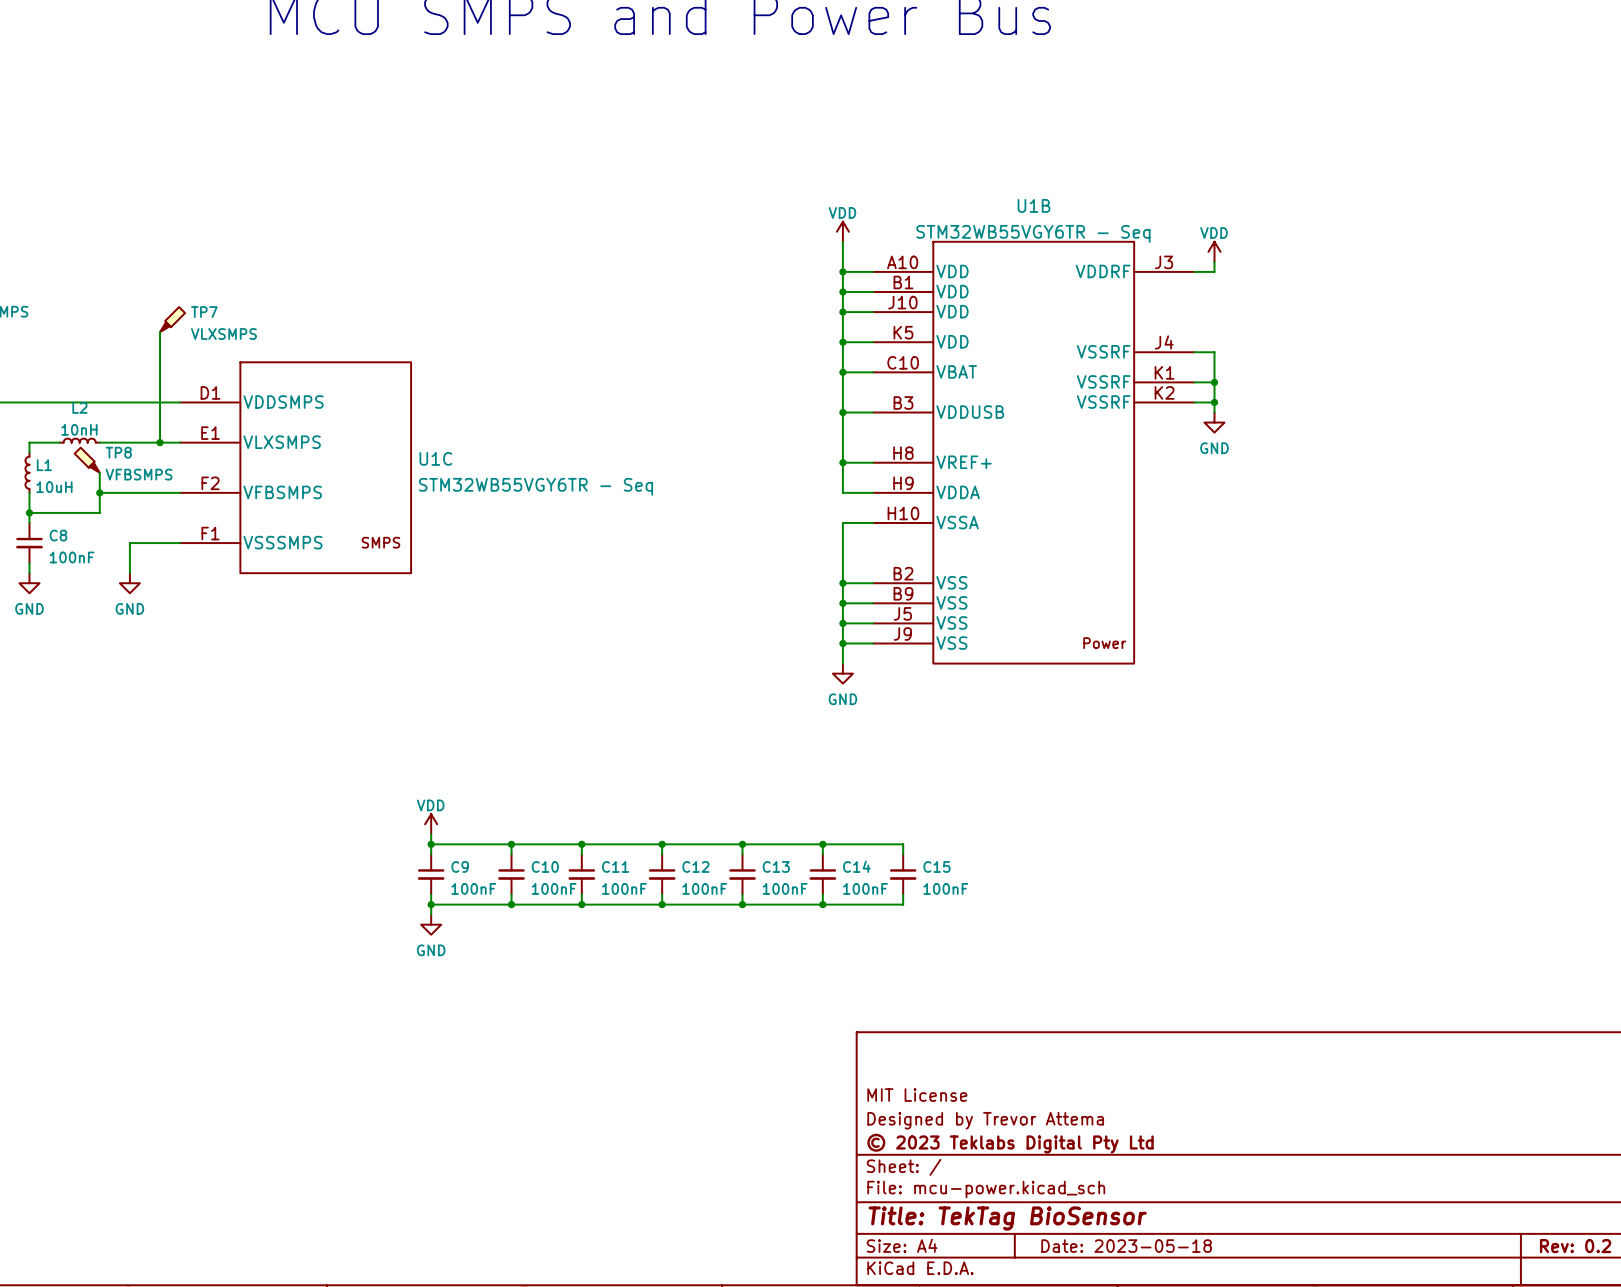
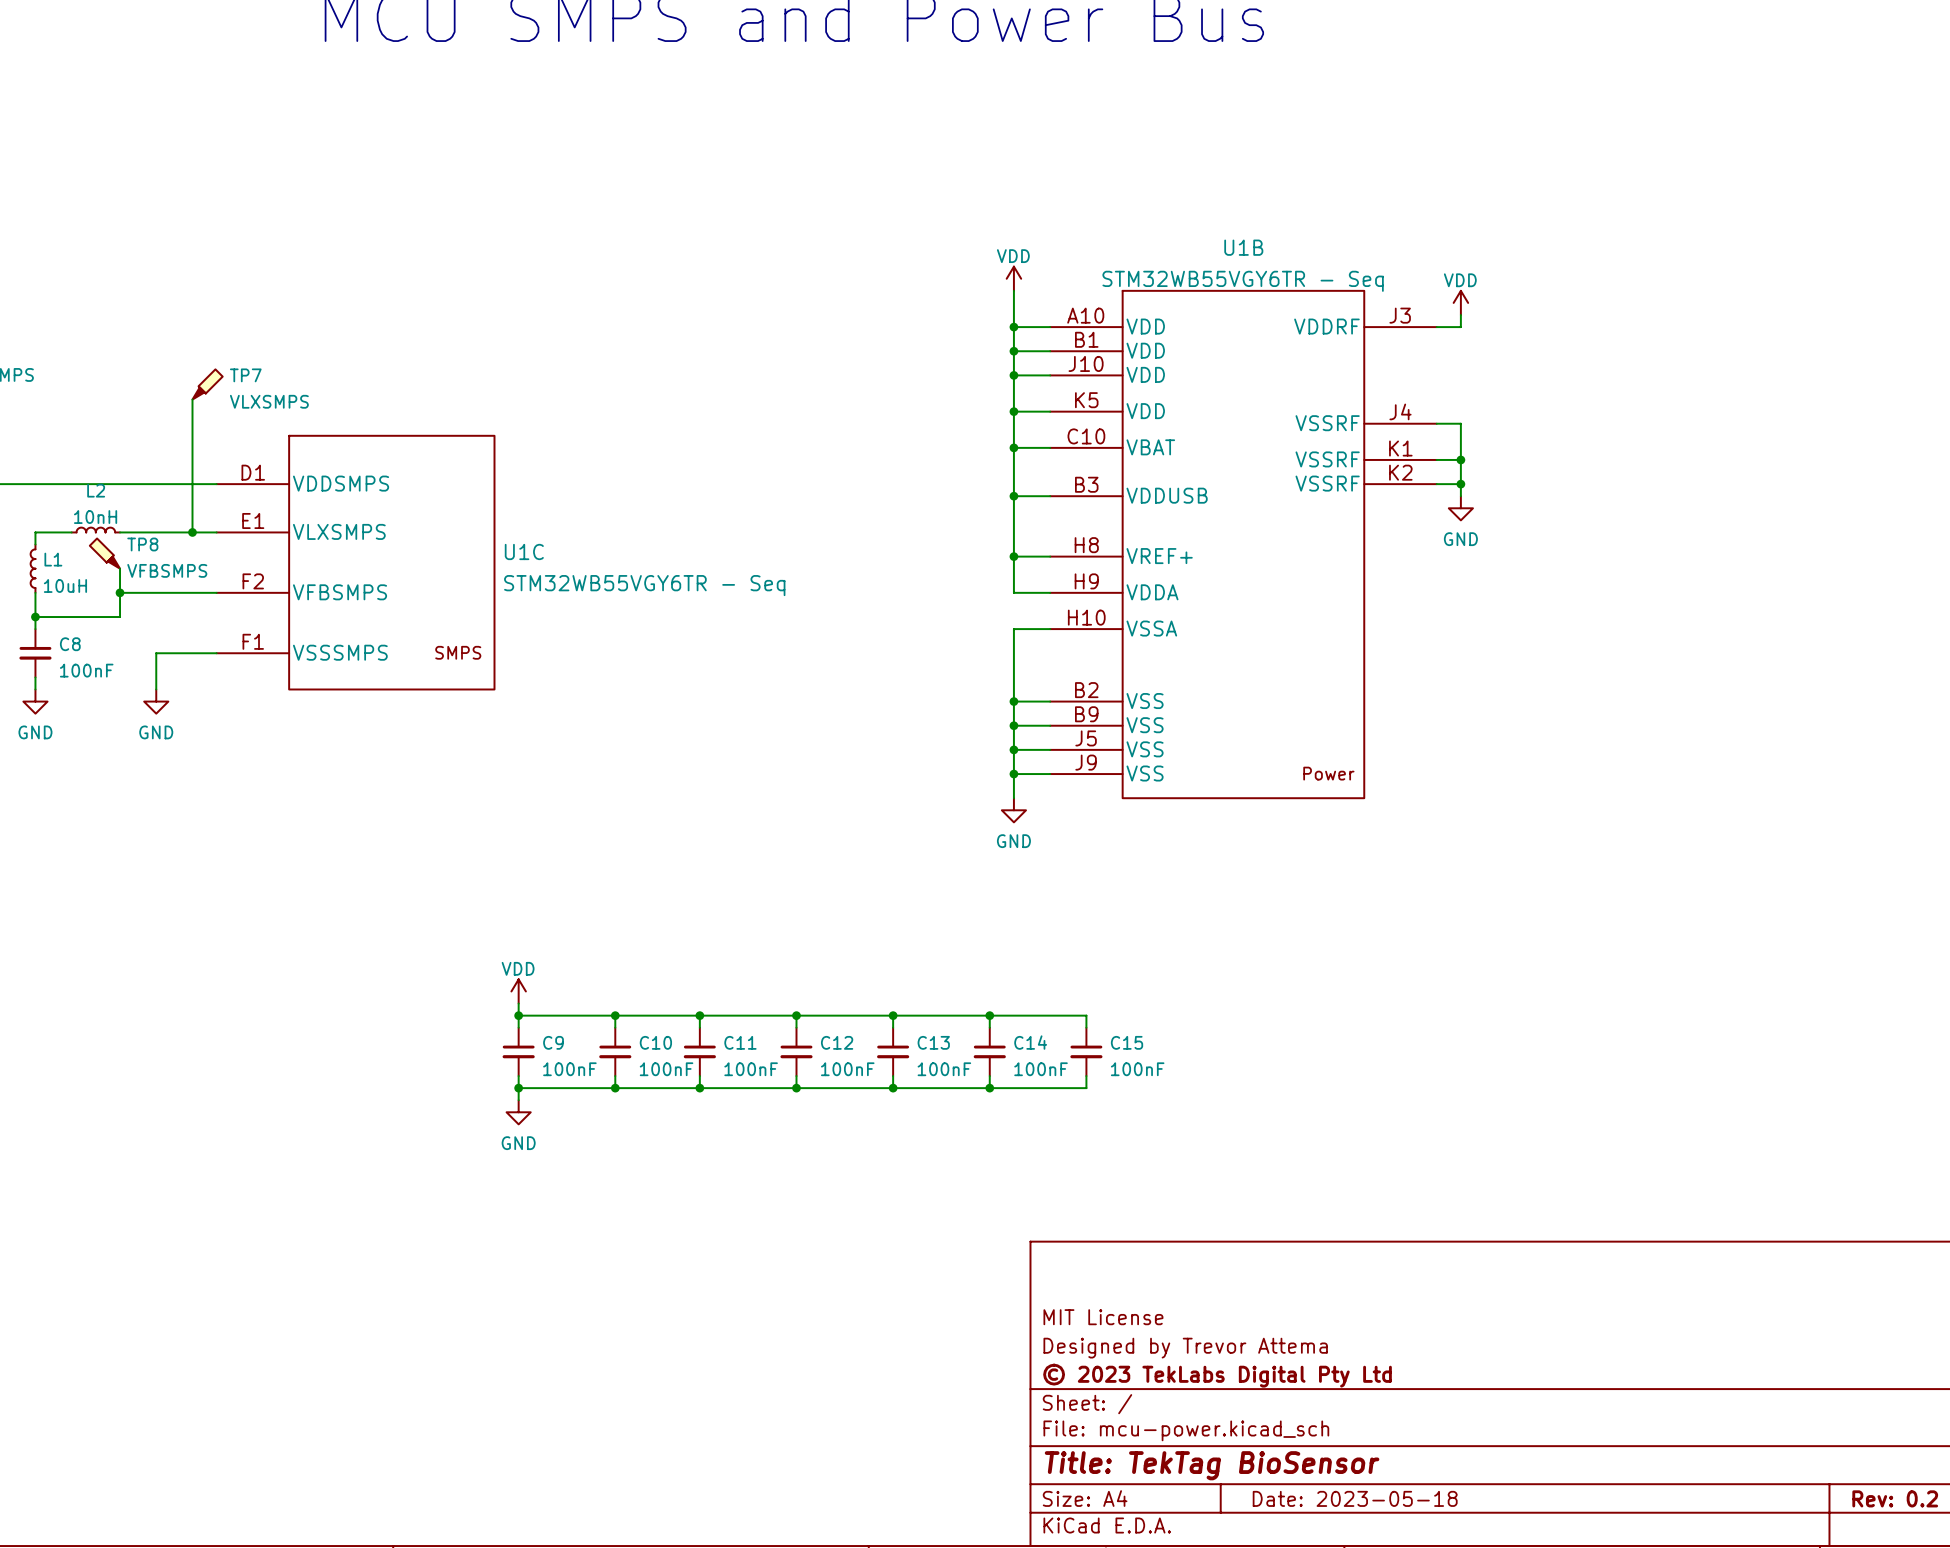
title block: © 2023 Teklabs Digital Pty Ltd (1010, 1143) -> © 2023 TekLabs Digital Pty Ltd (1217, 1375)

